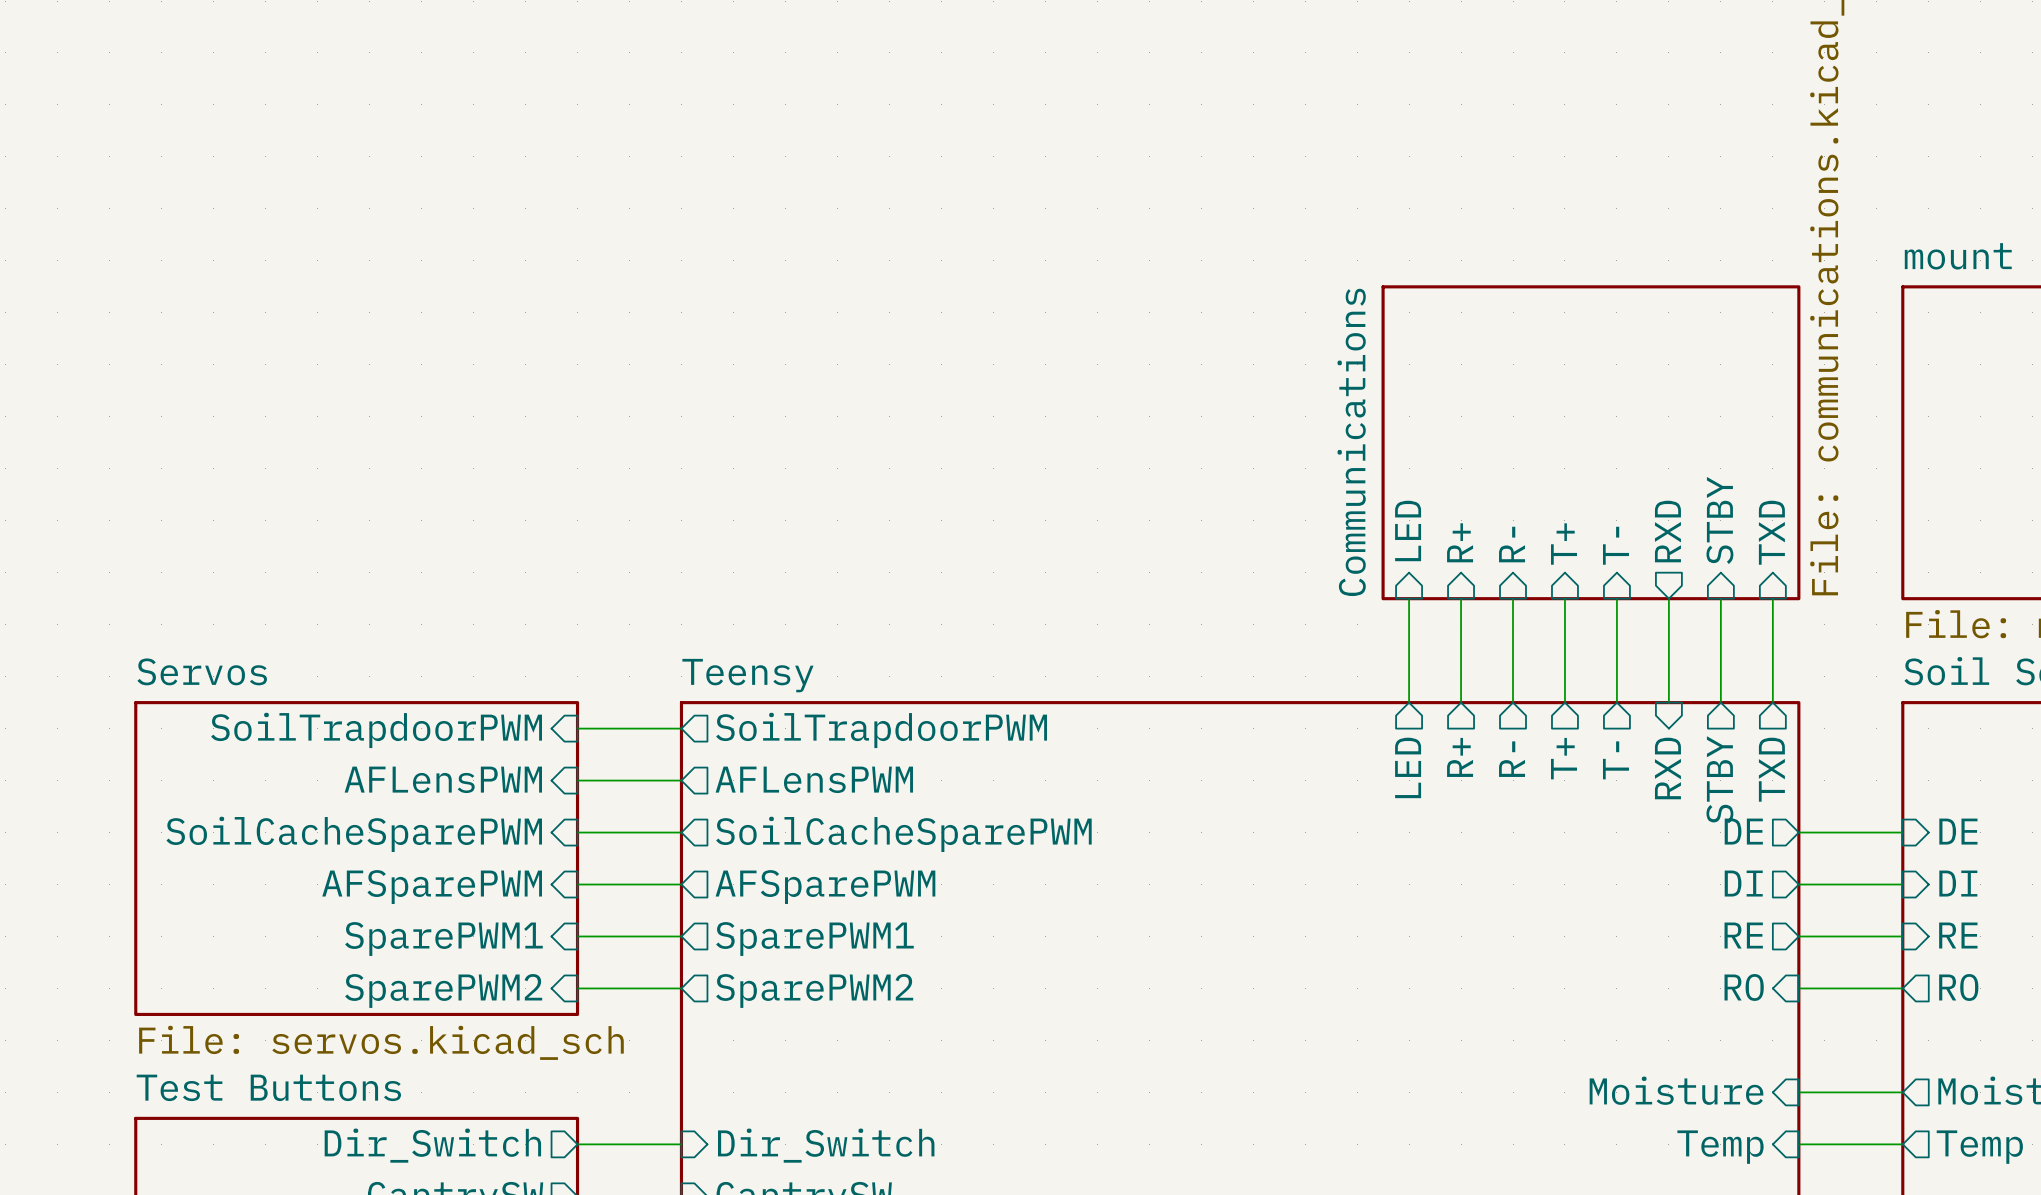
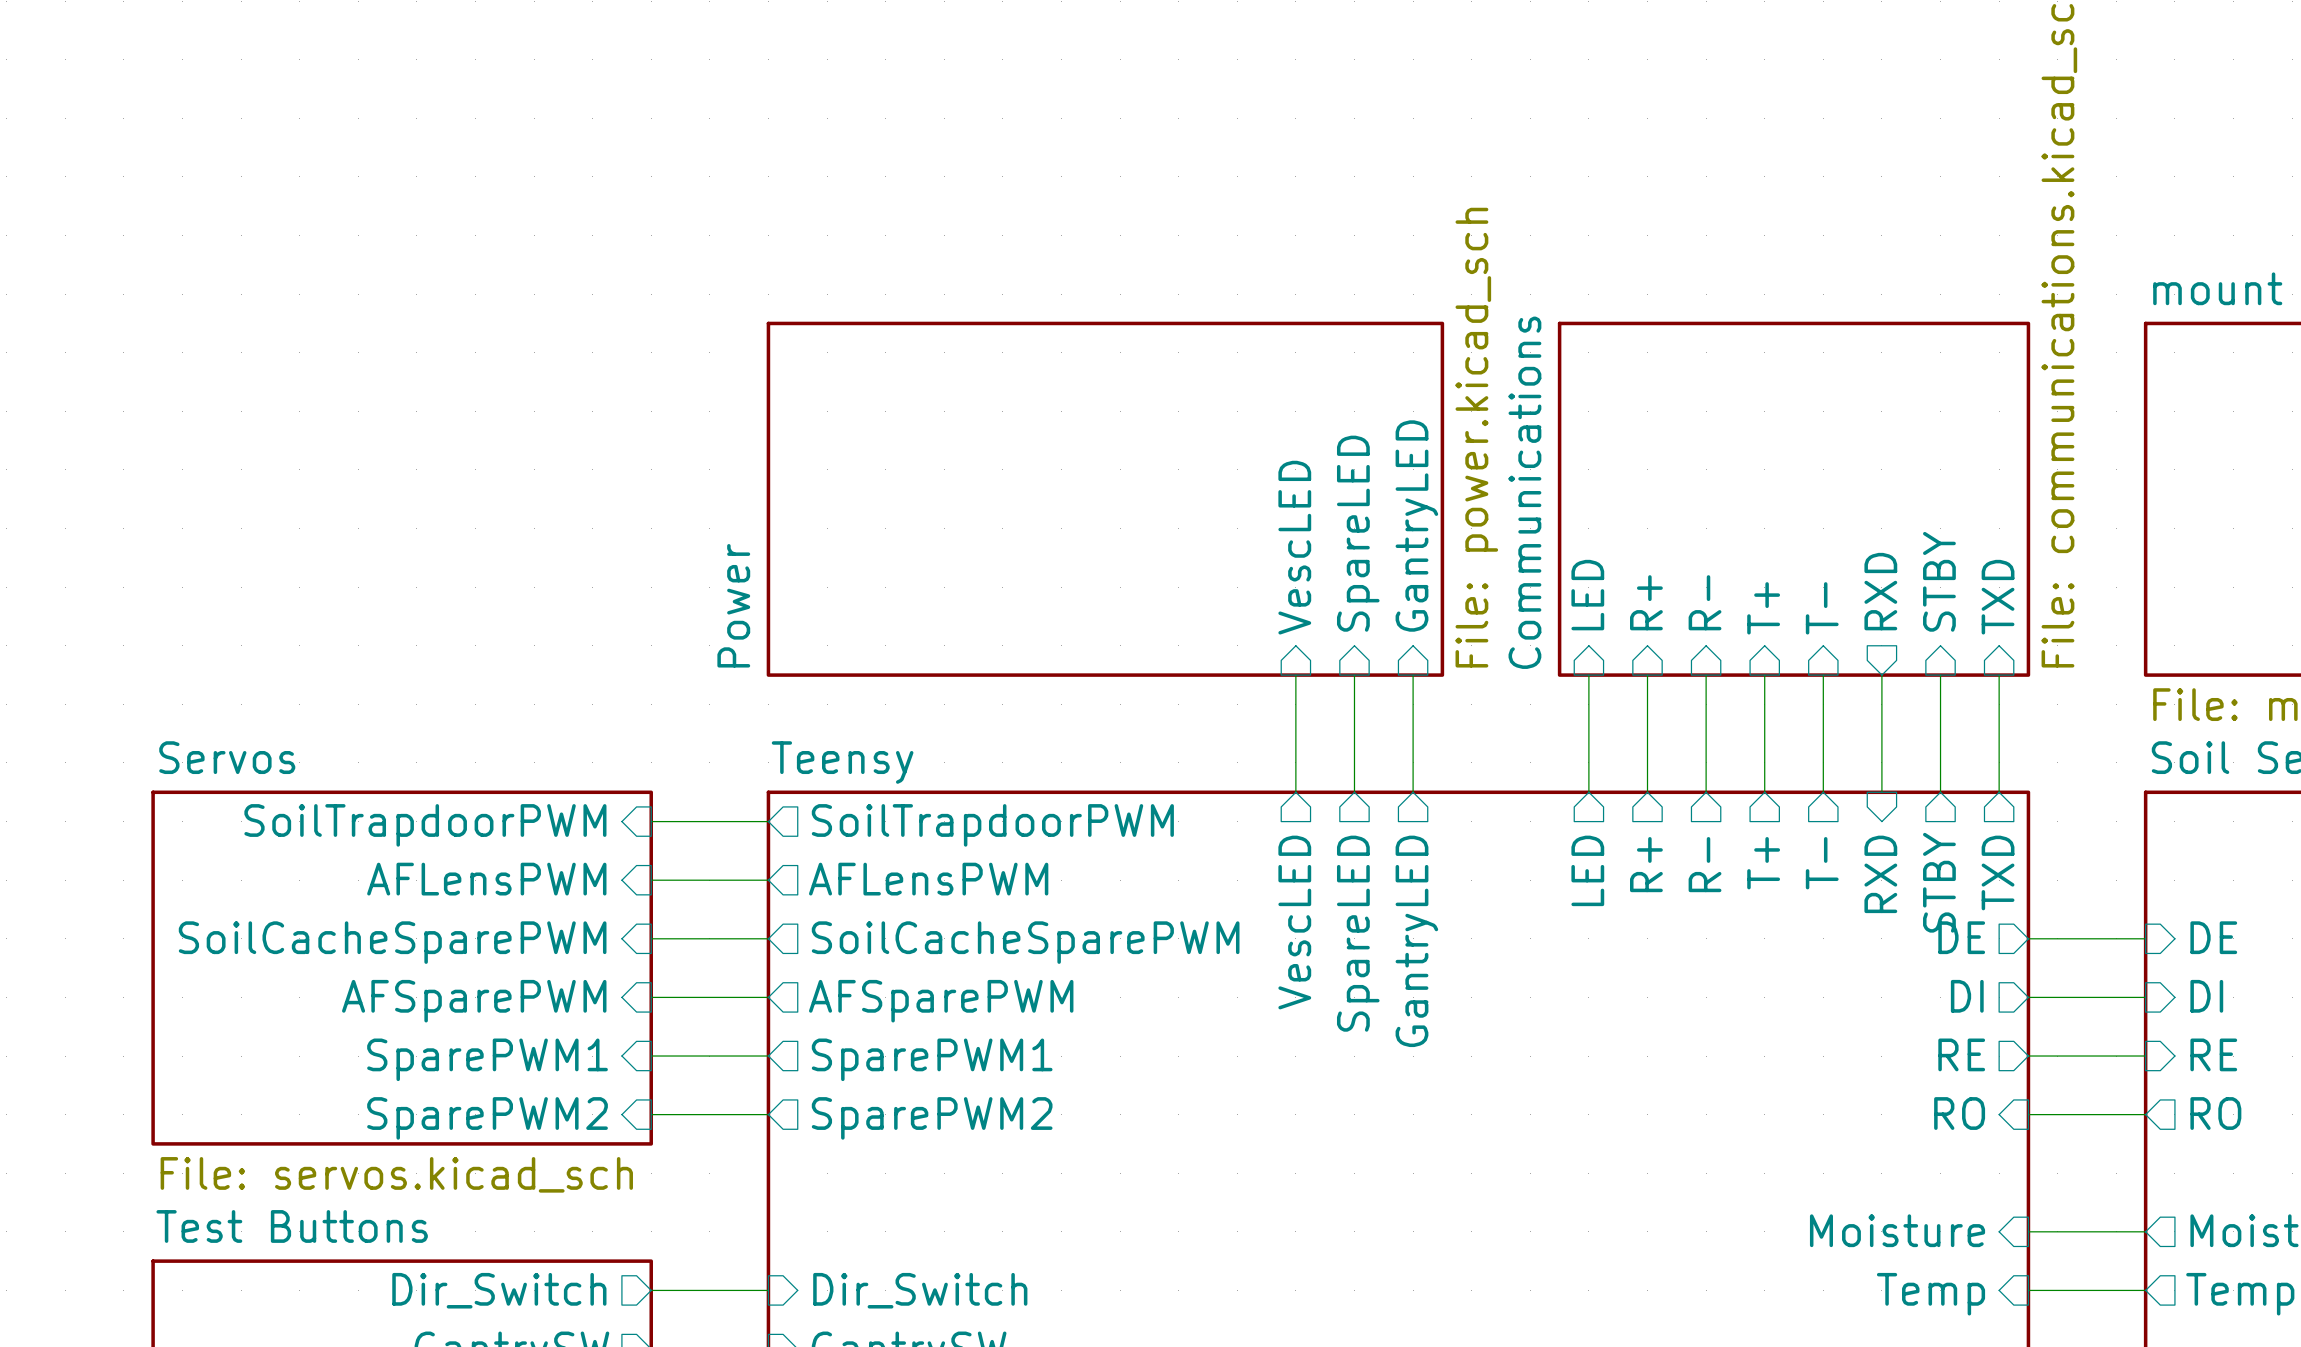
sheet Power: none -> File: power.kicad_sch (1105, 499)
sheet pin: none -> GantryLED (1416, 526)
sheet pin: none -> SpareLED (1358, 533)
sheet pin: none -> VescLED (1294, 547)
wire: none -> (1295, 675) (1295, 792)
wire: none -> (1354, 675) (1354, 792)
wire: none -> (1413, 675) (1413, 792)
sheet pin: none -> VescLED (1294, 922)
sheet pin: none -> SpareLED (1358, 933)
sheet pin: none -> GantryLED (1416, 941)

